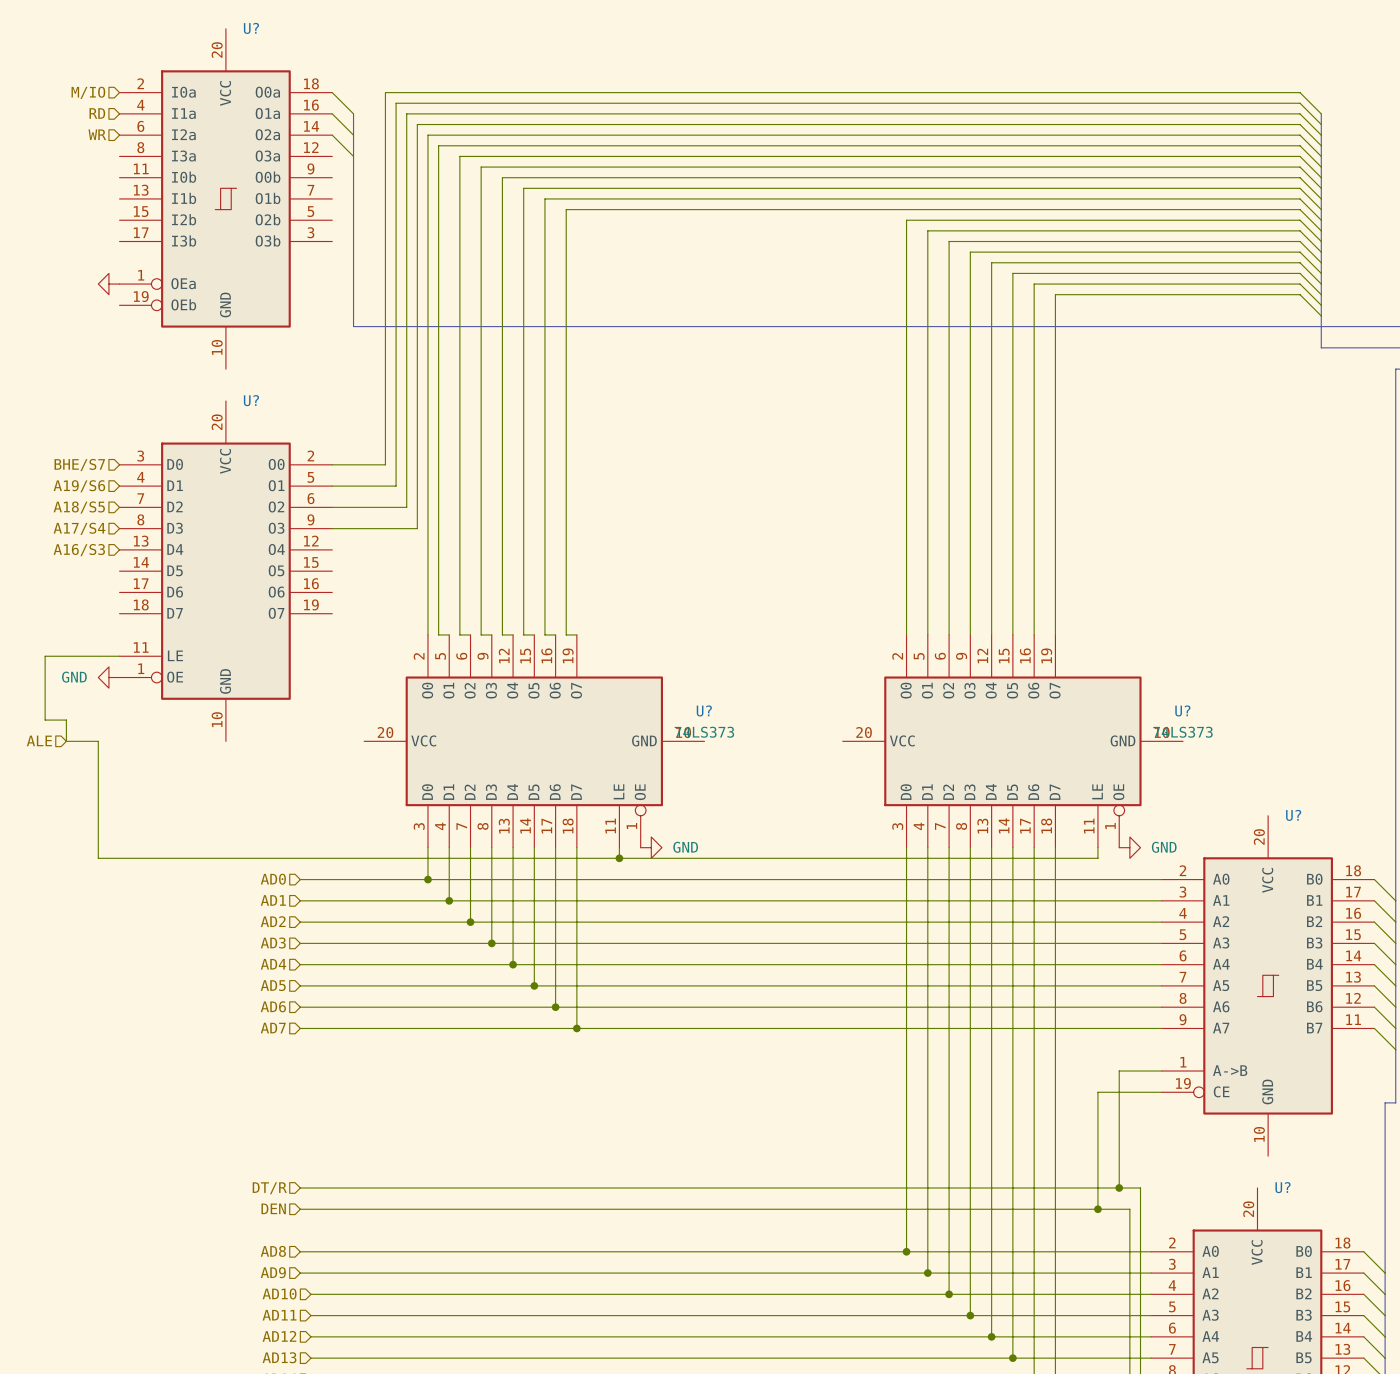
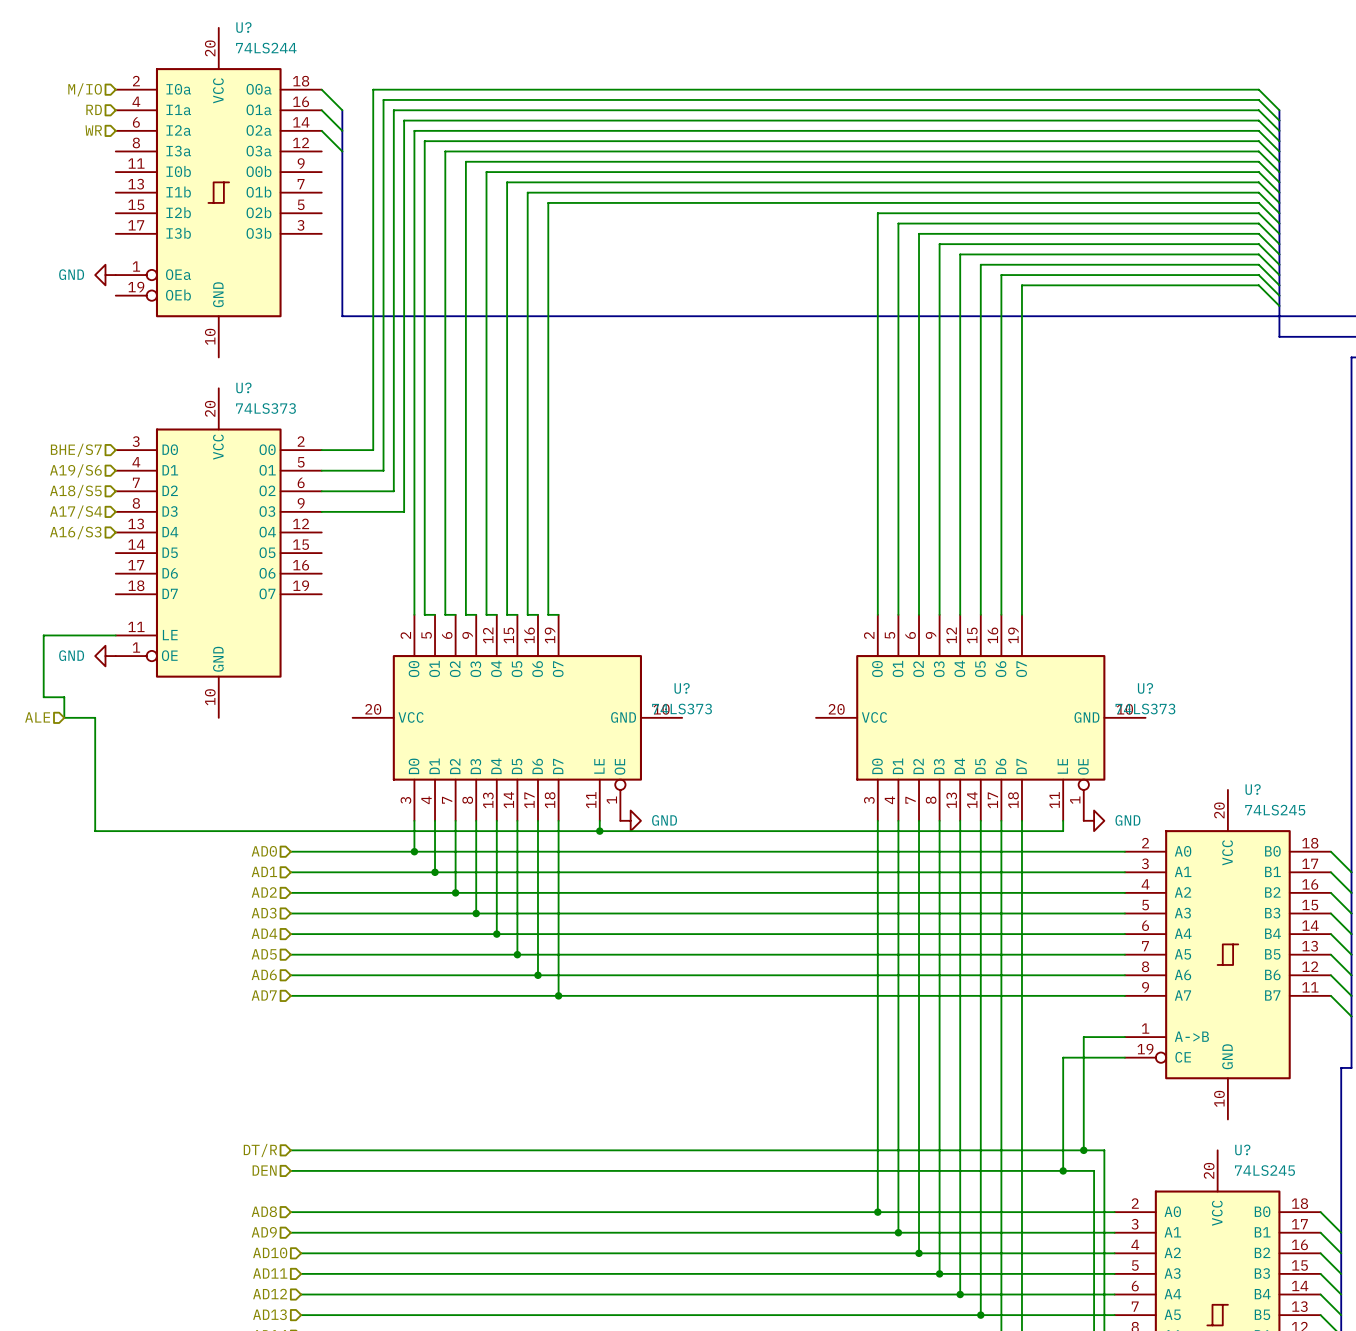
U? value: none -> 74LS244 (266, 48)
power symbol text: none -> GND (71, 274)
U? value: none -> 74LS373 (265, 408)
U? value: none -> 74LS245 (1275, 810)
U? value: none -> 74LS245 (1264, 1170)

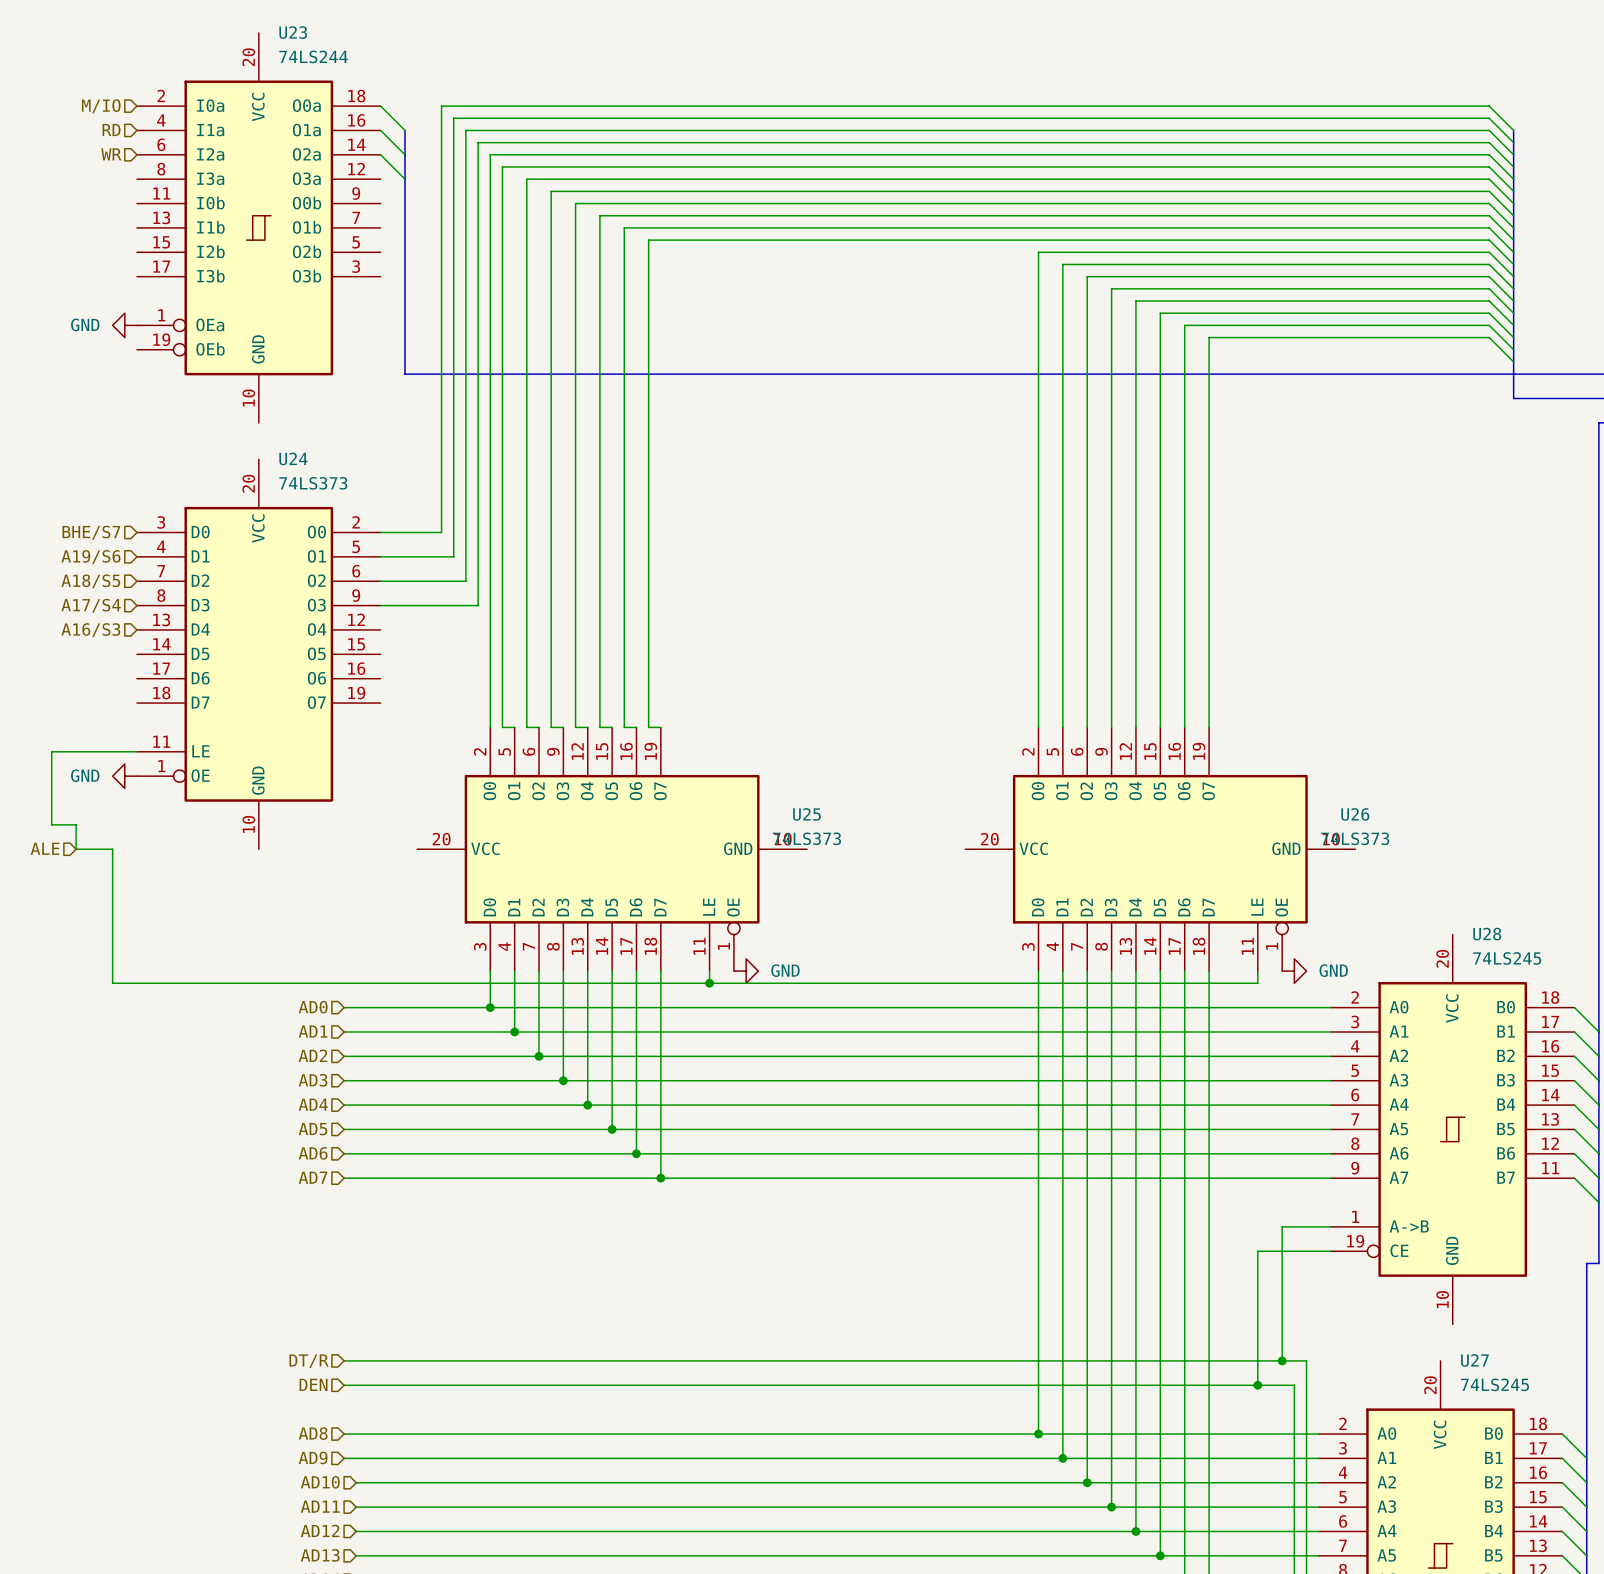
U? name: U? (243, 27) -> U23 (293, 32)
U? name: U? (243, 387) -> U24 (293, 458)
U? name: U? (682, 688) -> U25 (806, 814)
U? name: U? (1145, 688) -> U26 (1355, 814)
U? name: U? (1253, 789) -> U28 (1487, 934)
U? name: U? (1242, 1149) -> U27 (1474, 1360)

